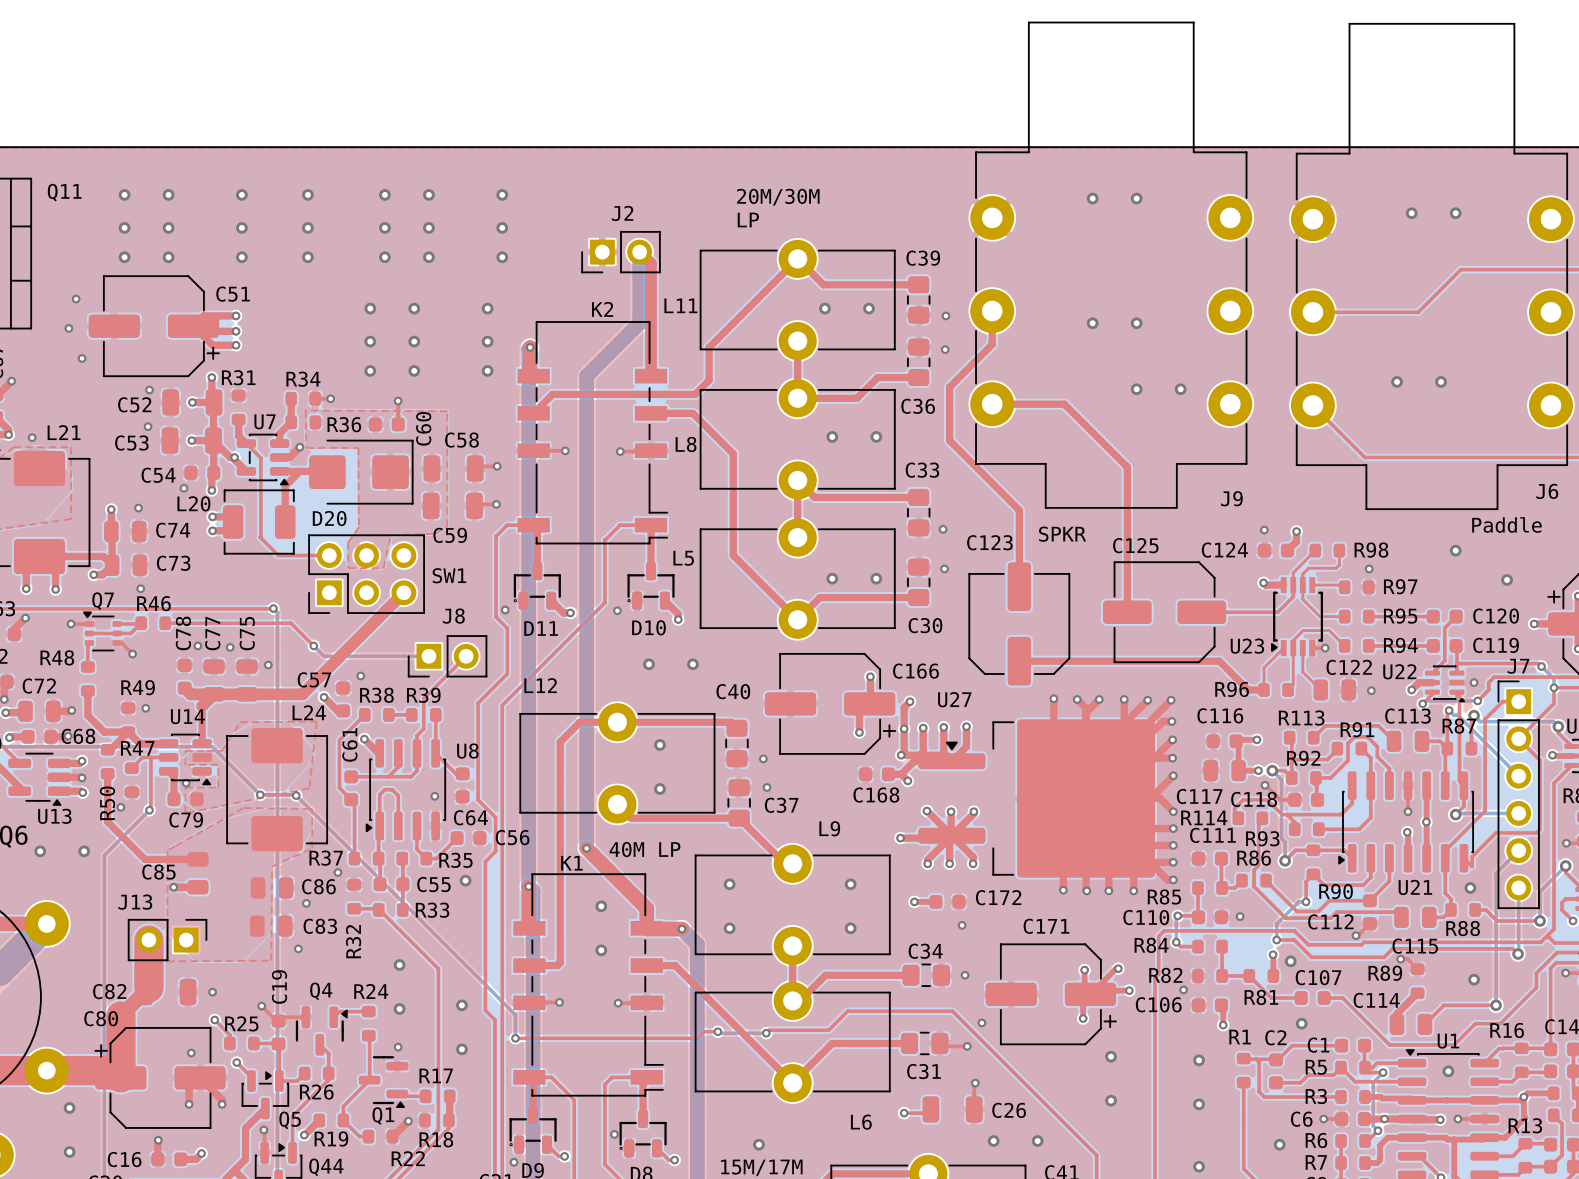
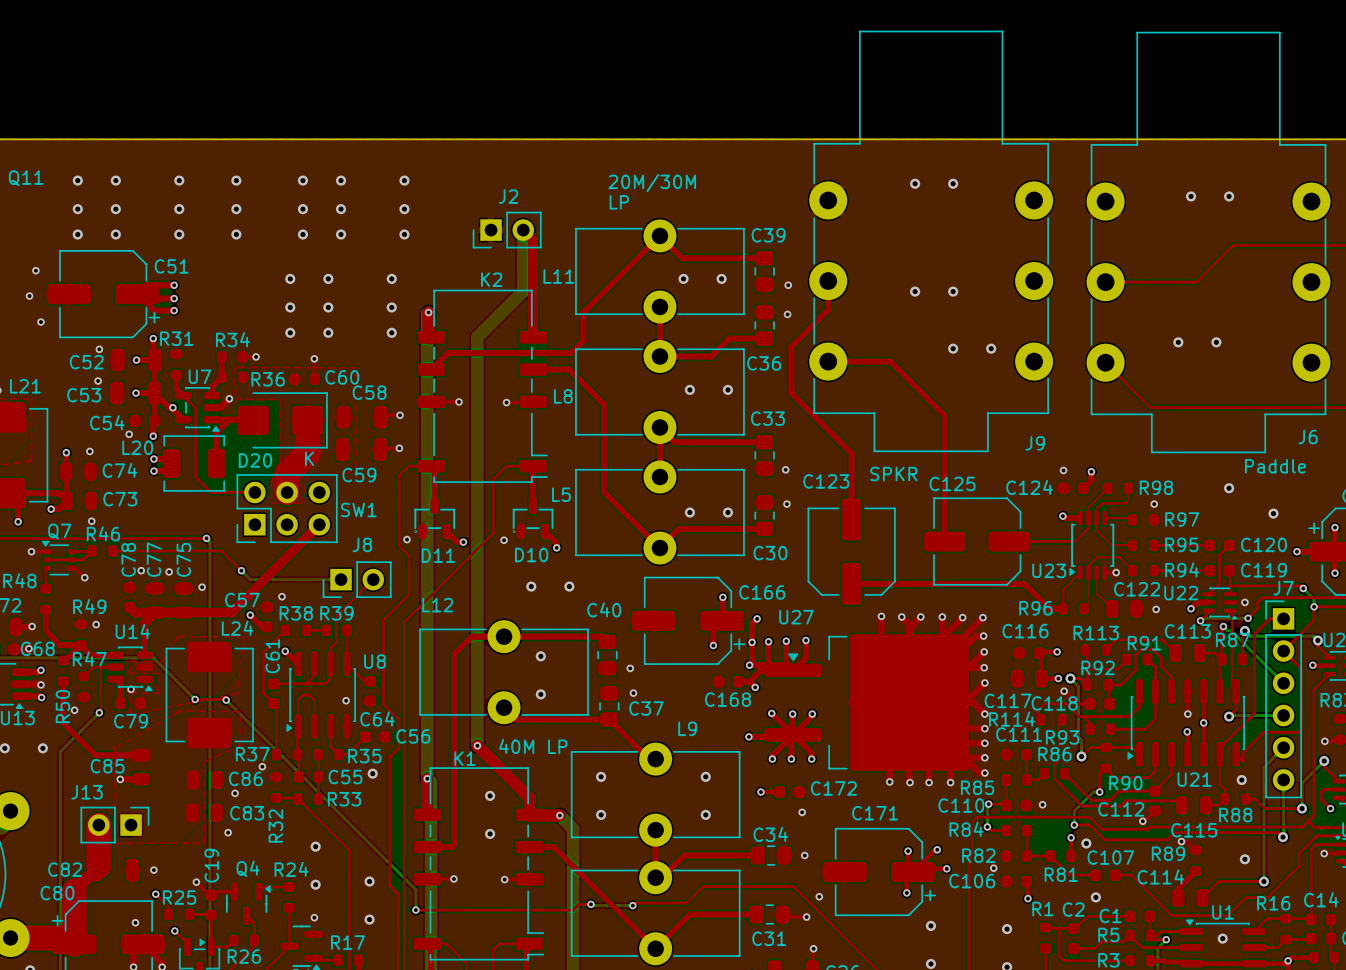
C60 name rotation: 0° (423, 428) -> 90° clockwise (342, 377)
top track: none -> (307, 420) (307, 452) (287, 473) (287, 492)
text: none -> K (309, 458)

